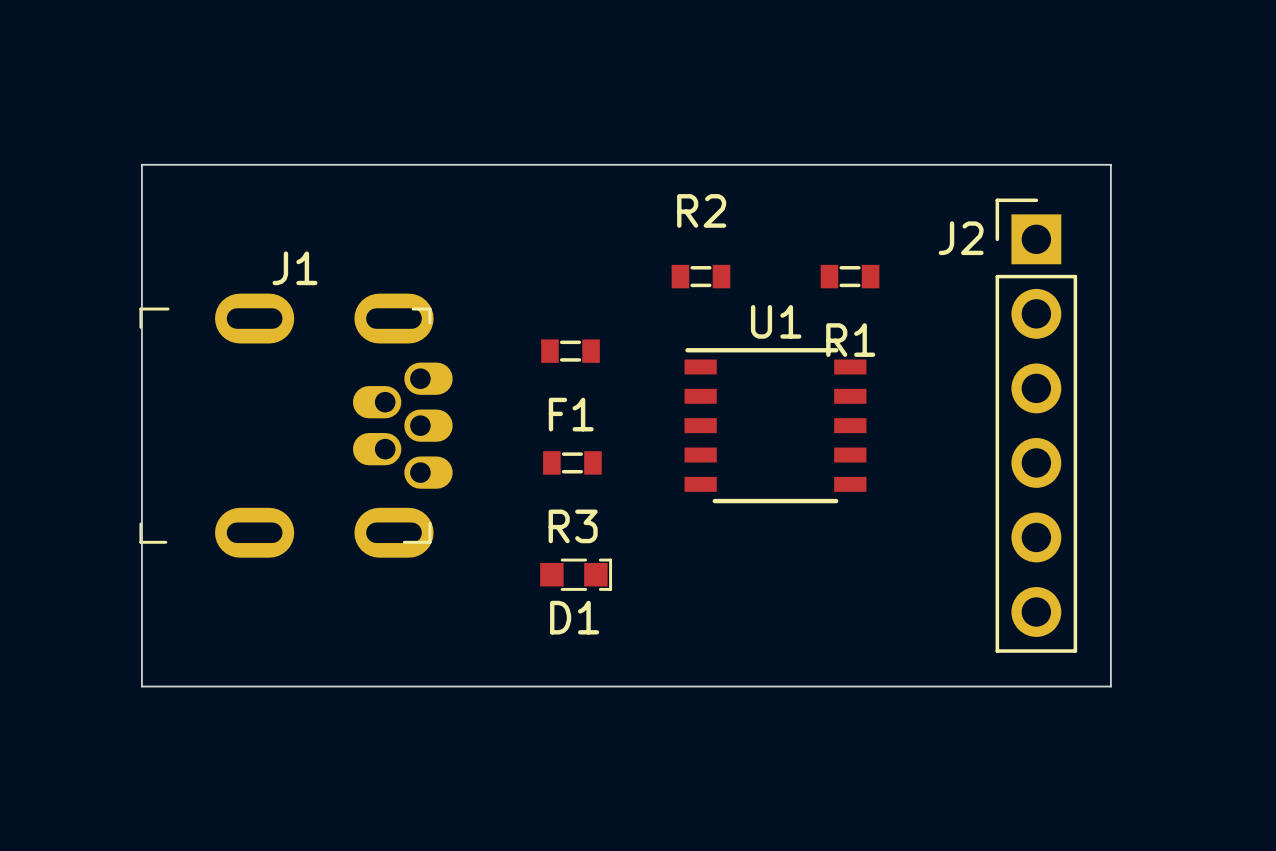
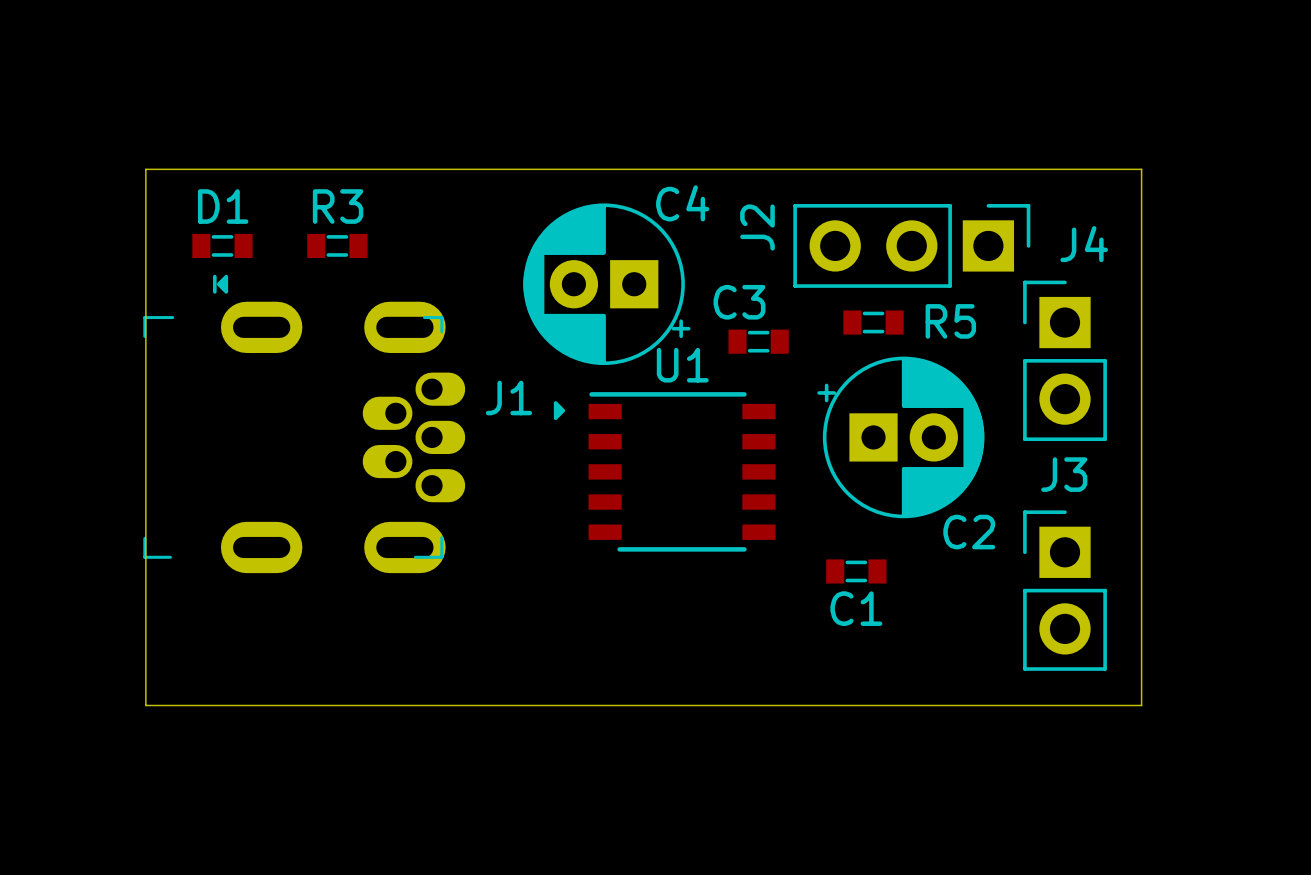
J2 footprint: [995, 198, 1078, 653] -> [793, 204, 1031, 288]
J2 name position: J2 (961, 238) -> J2 (757, 227)
drawing: none -> [216, 274, 229, 294]
J1 name position: J1 (295, 268) -> J1 (508, 398)
line: none -> (214, 276) (214, 291)
C4: none -> (606, 284)
R2: (700, 276) -> none
R1: (850, 276) -> none
R5: none -> (873, 322)
C3: none -> (758, 341)
F1: (570, 351) -> none
J4: none -> (1065, 360)
drawing: none -> [553, 401, 566, 421]
U1 position: (775, 425) -> (682, 471)
C2: none -> (900, 437)
R3 position: (572, 462) -> (337, 245)
R3 name position: R3 (573, 526) -> R3 (338, 206)
C1: none -> (856, 571)
D1 footprint: [540, 558, 613, 591] -> [192, 233, 253, 259]
J3: none -> (1065, 590)
D1 name position: D1 (574, 617) -> D1 (223, 206)

